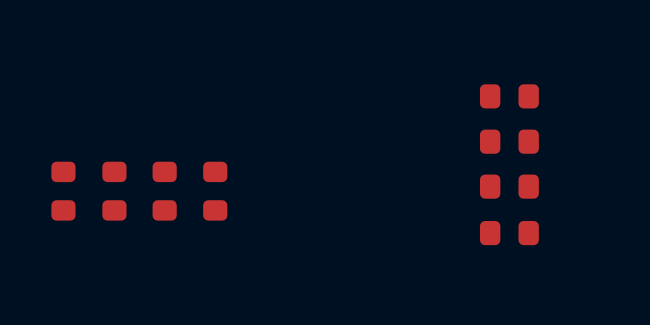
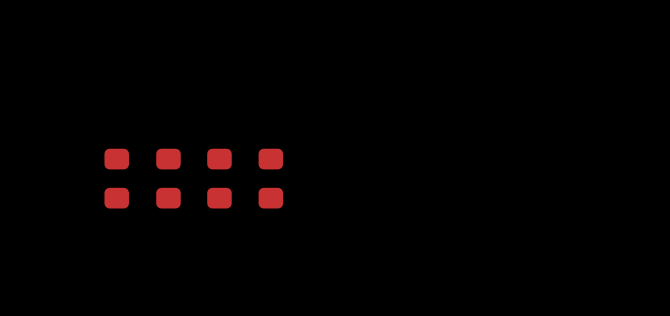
part: (509, 96) -> none
part: (509, 141) -> none
part: (509, 186) -> none
part: (509, 233) -> none

